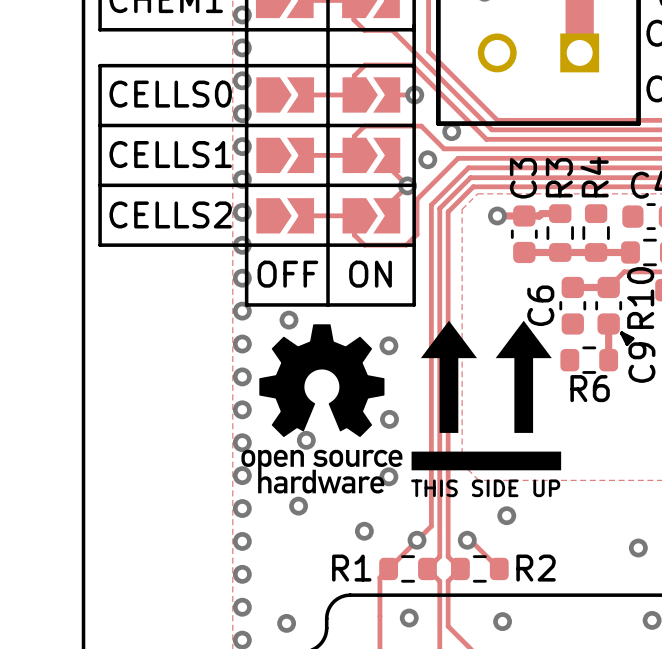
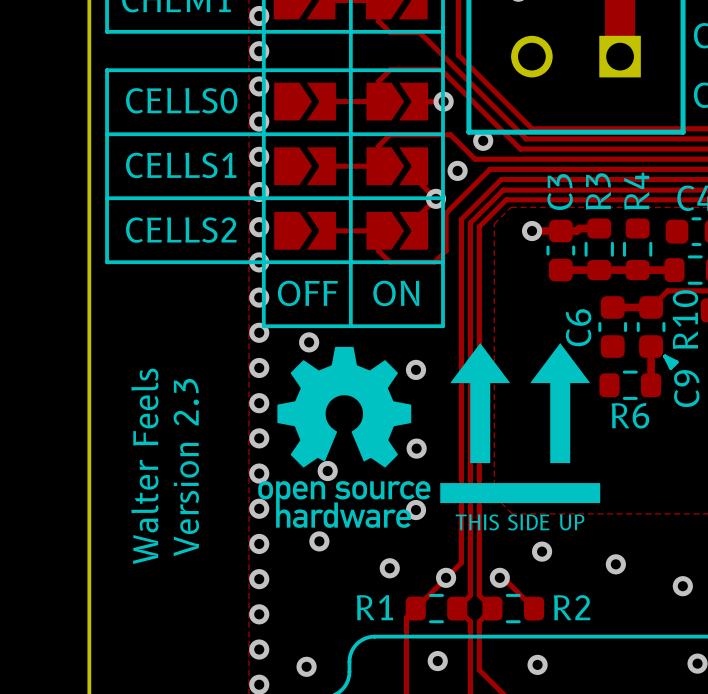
text: none -> Walter Feels (144, 466)
text: none -> Version 2.3 (186, 467)
via: none -> (615, 564)

